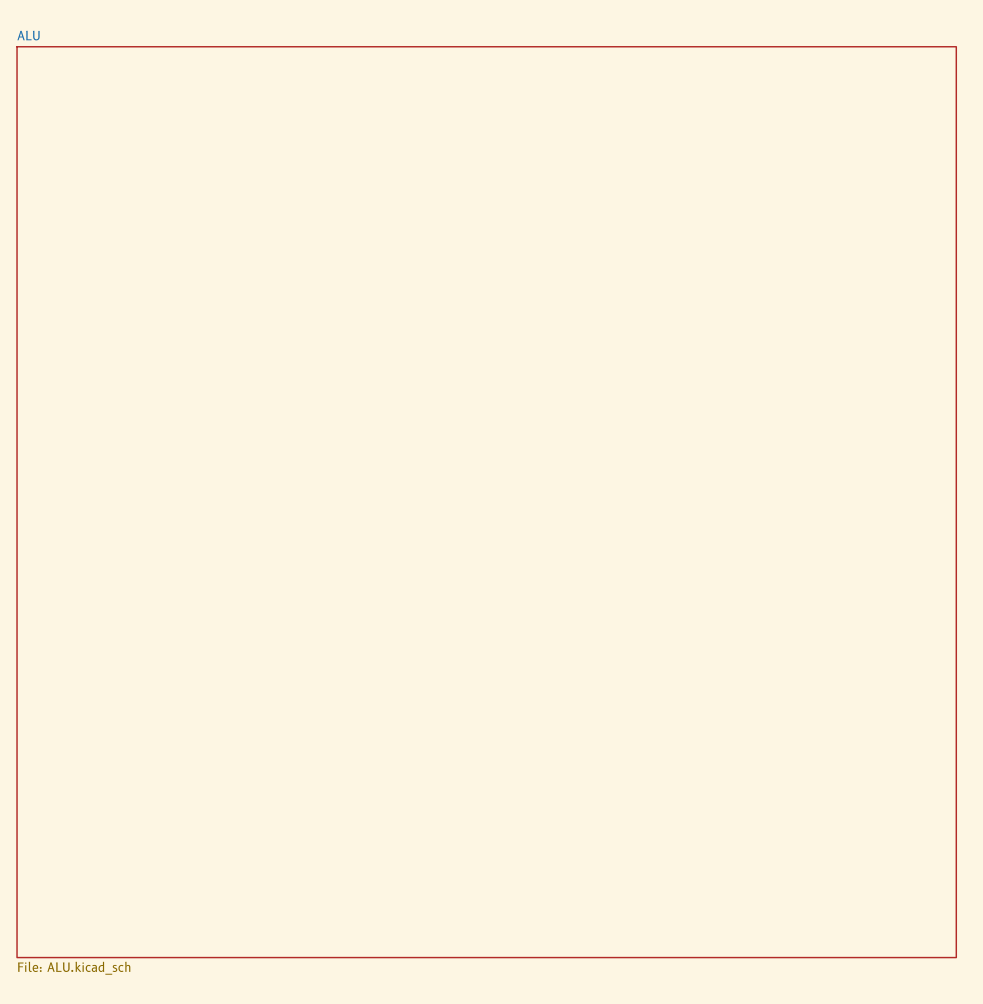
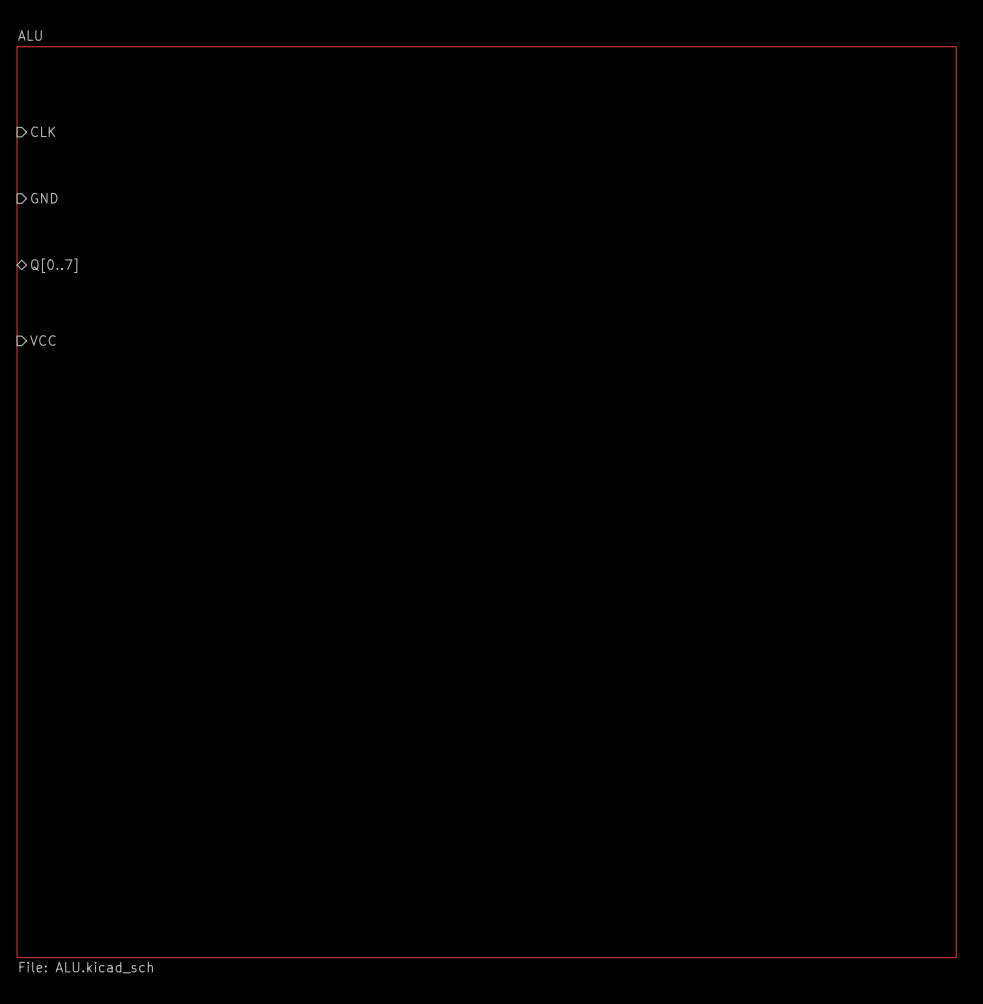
sheet pin: none -> CLK (43, 131)
sheet pin: none -> GND (44, 198)
sheet pin: none -> Q[0..7] (54, 265)
sheet pin: none -> VCC (42, 340)

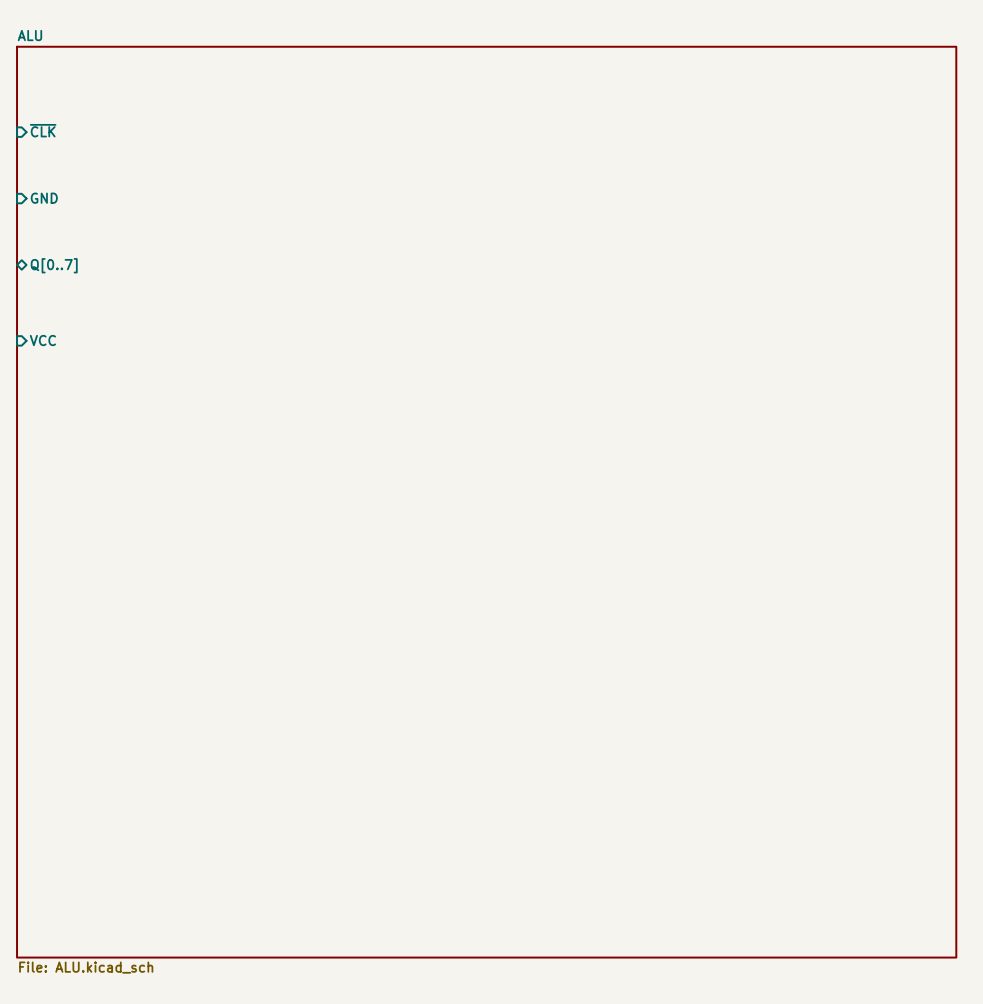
sheet pin: CLK (43, 131) -> ~{CLK} (43, 130)

